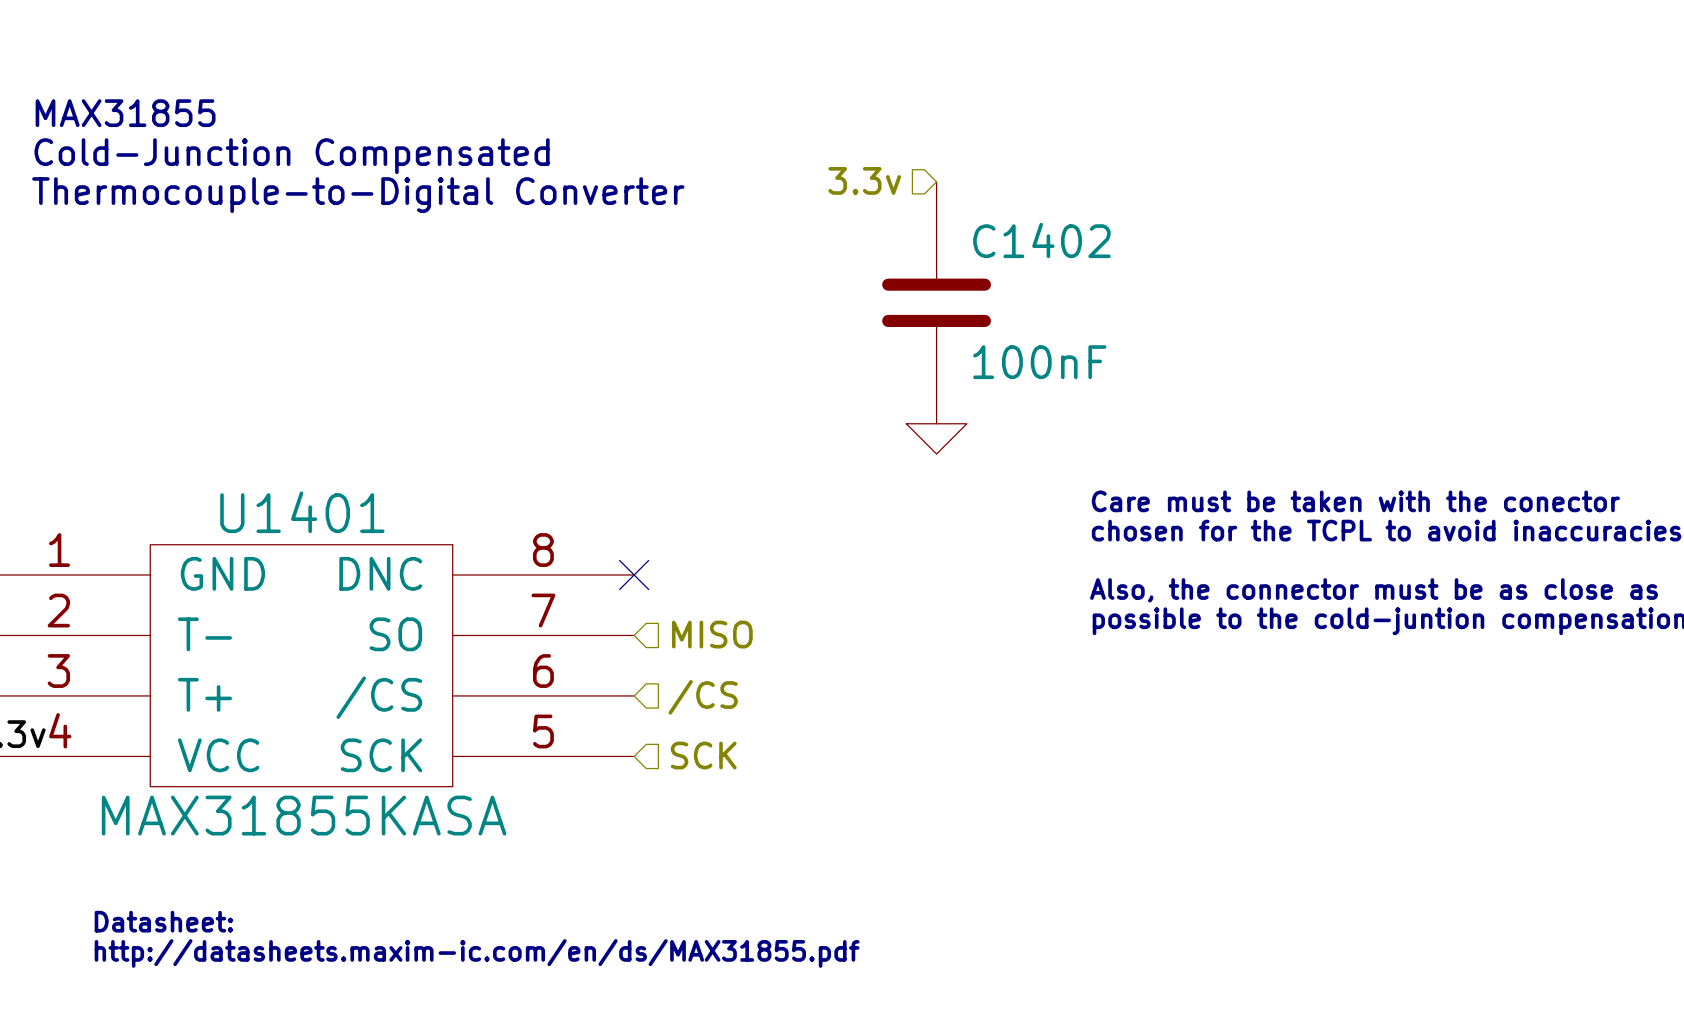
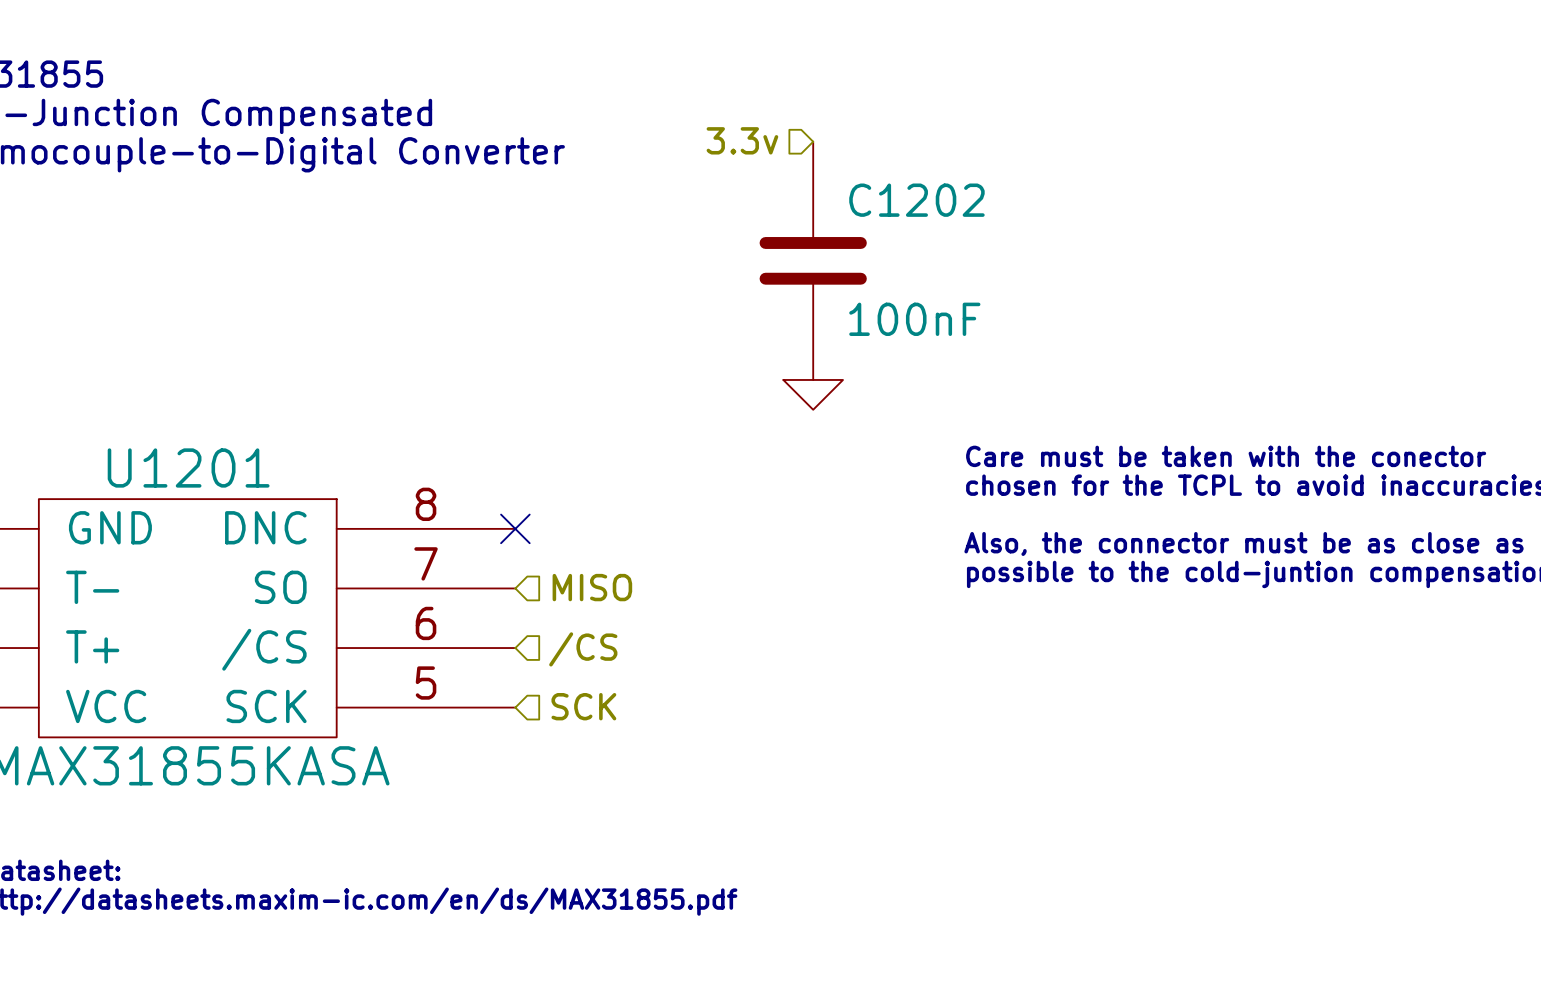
C1402 name: C1402 (1041, 240) -> C1202 (916, 200)
U1401 name: U1401 (302, 512) -> U1201 (188, 467)

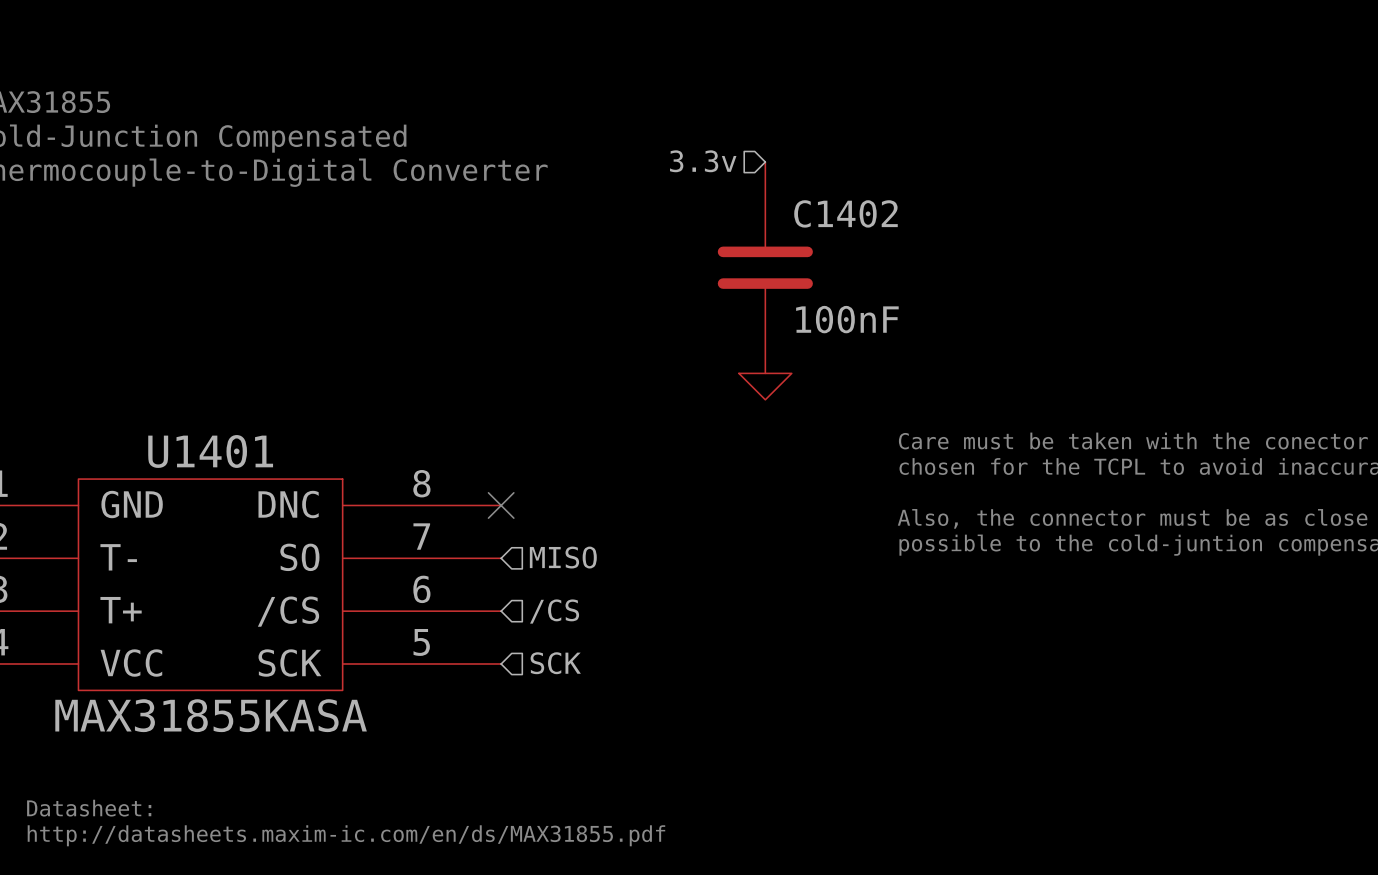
C1202 name: C1202 (916, 200) -> C1402 (845, 213)
U1201 name: U1201 (188, 467) -> U1401 (210, 451)

